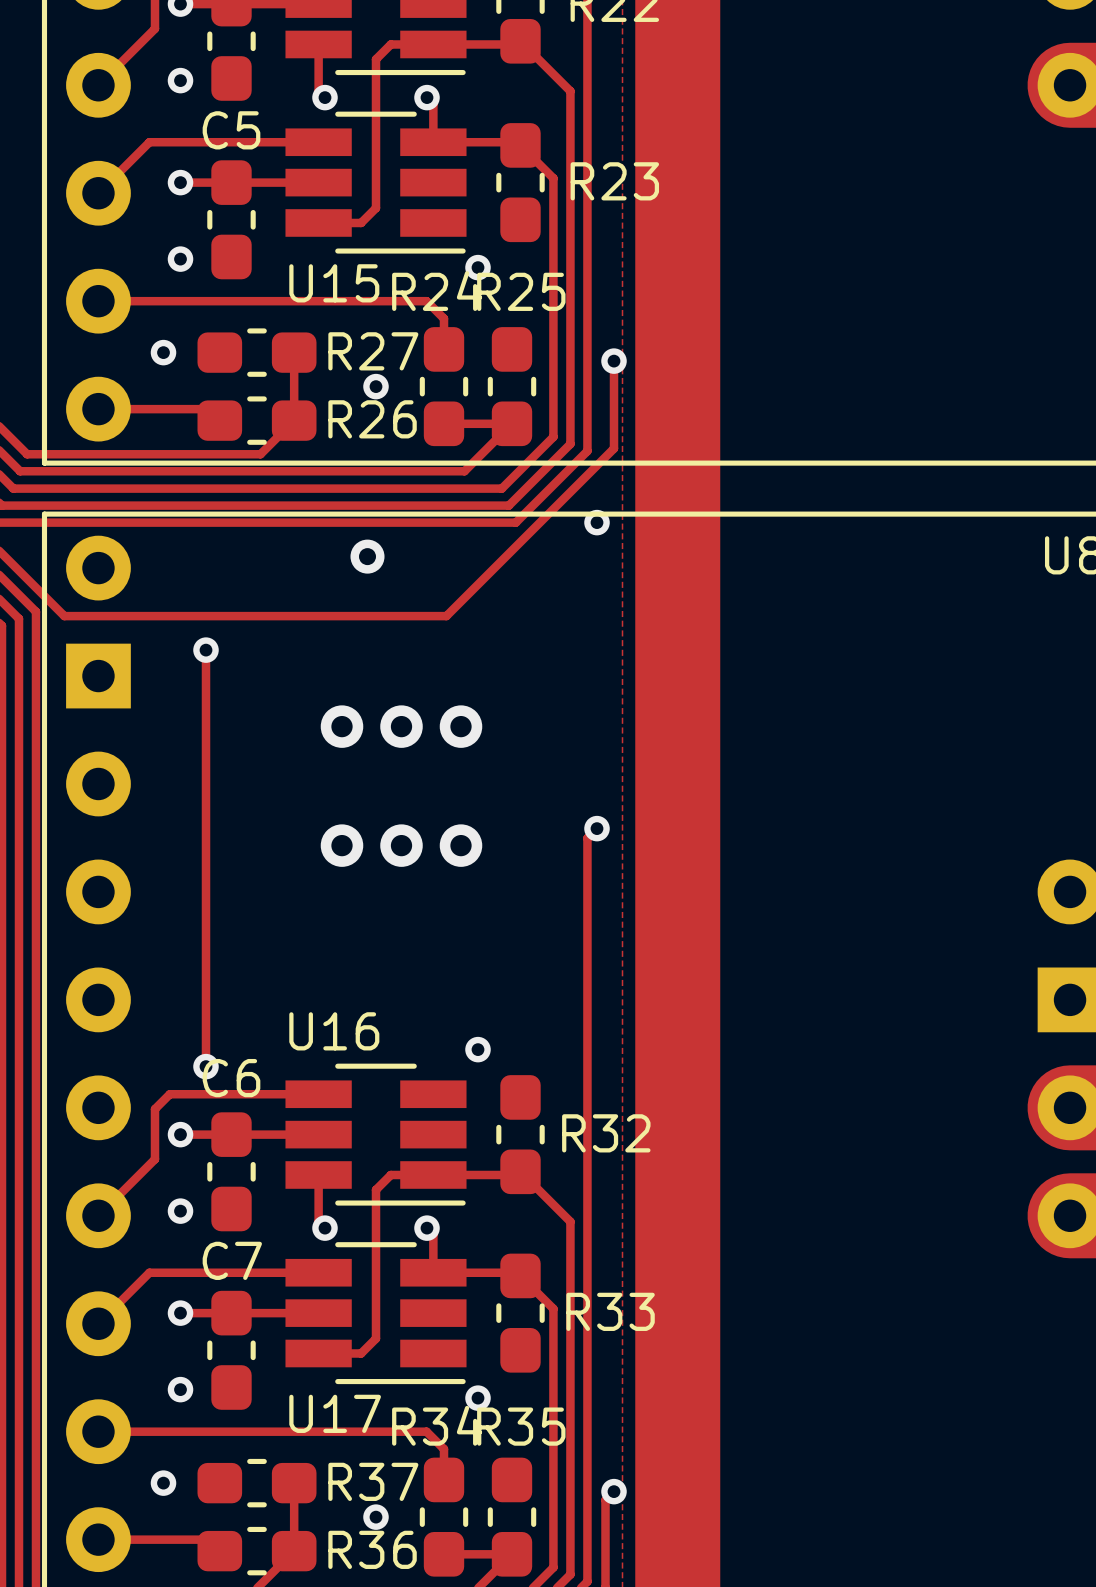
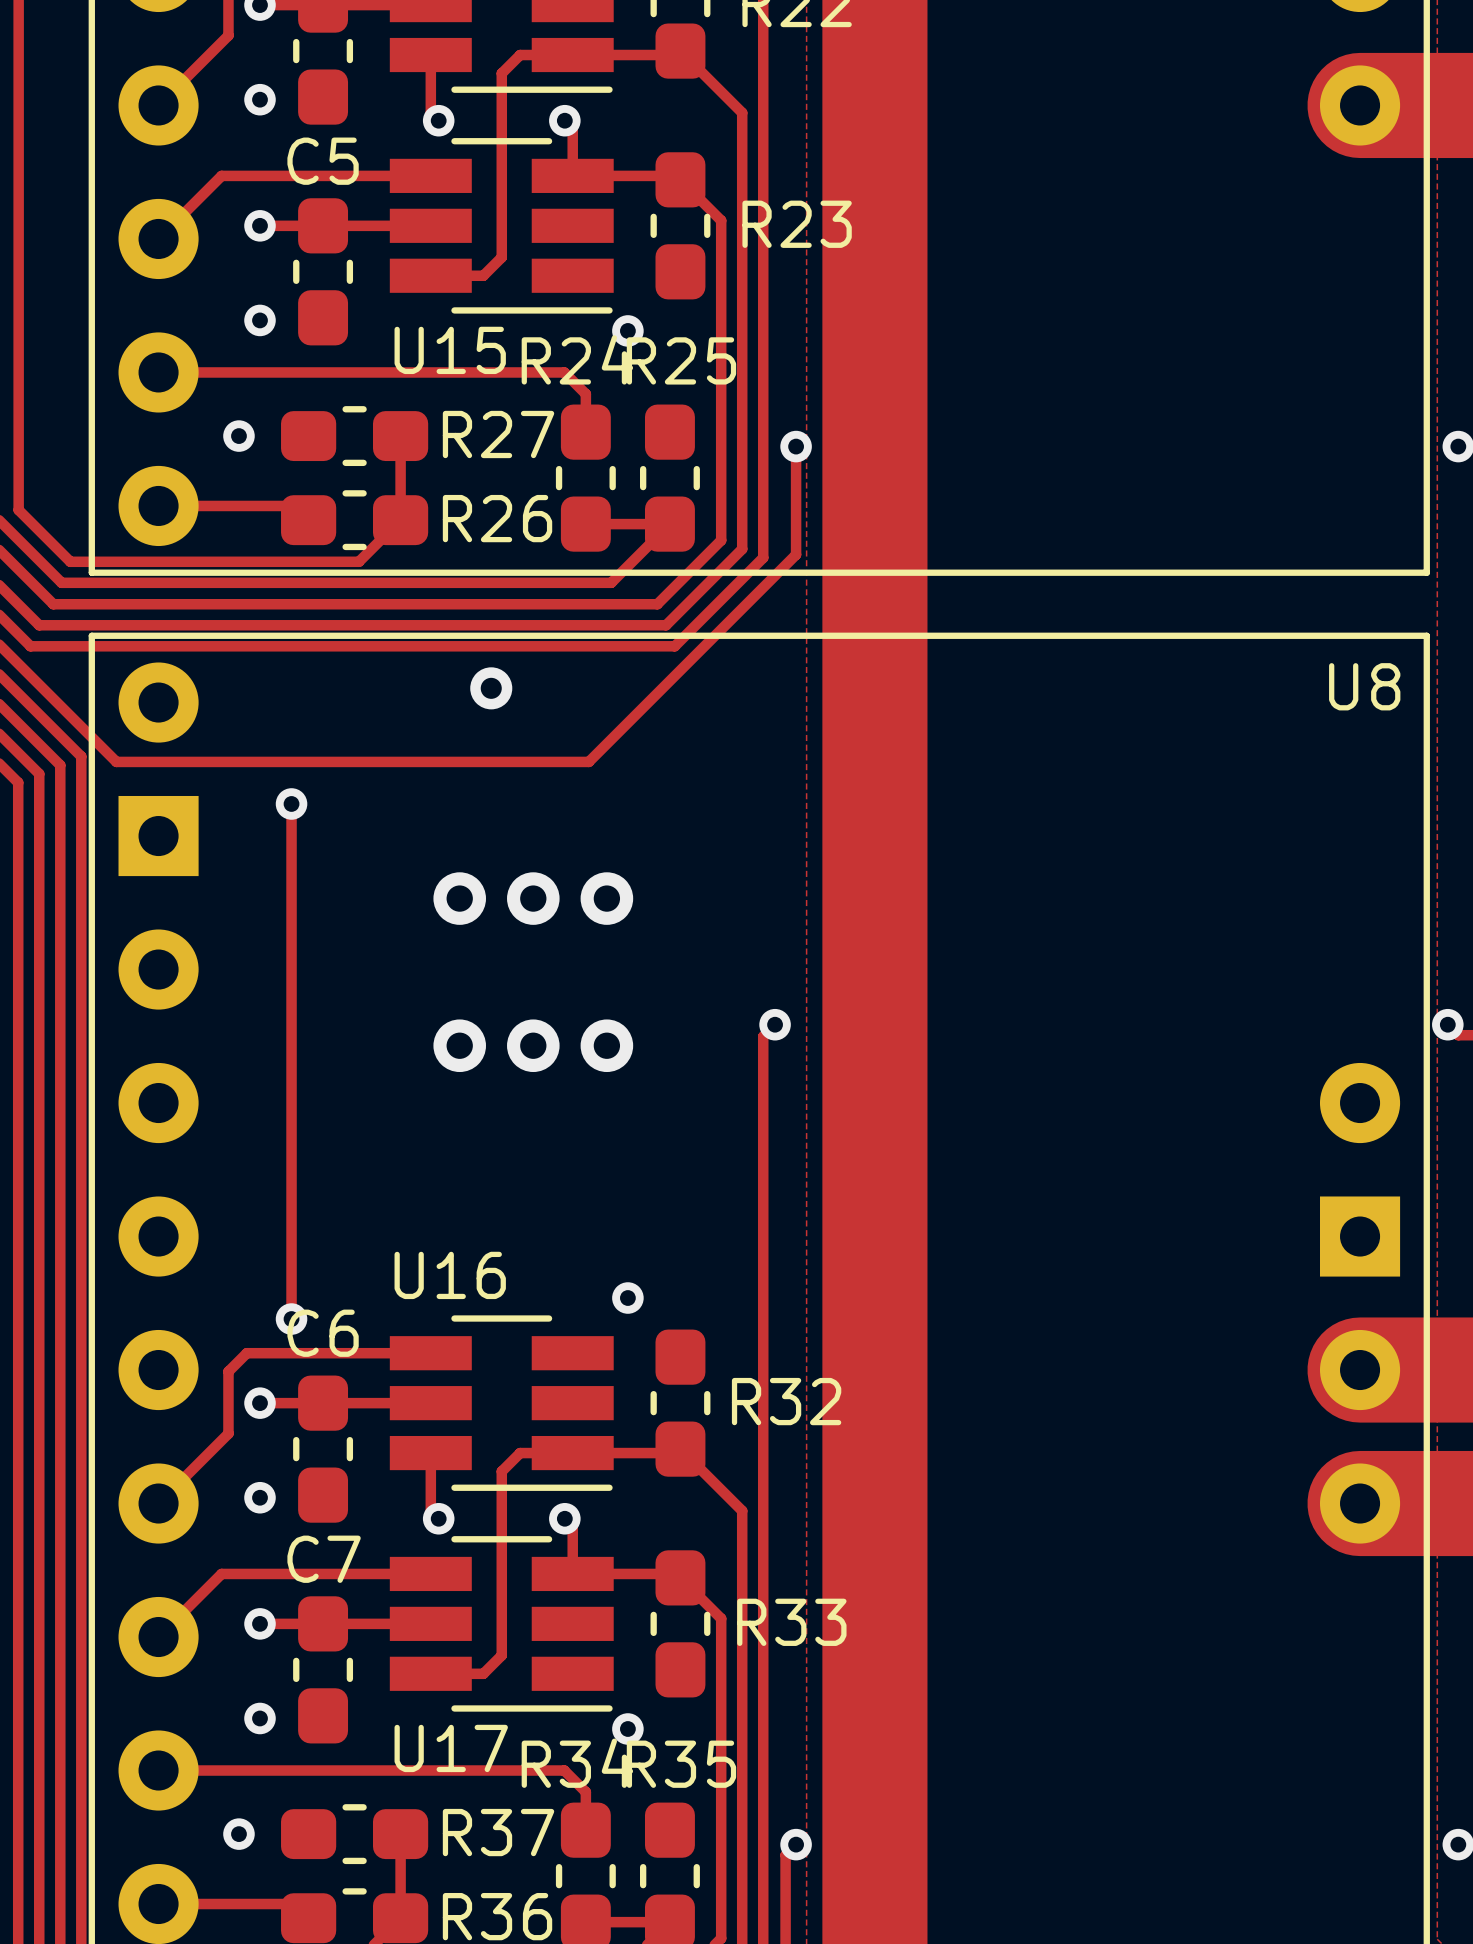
via: (376, 386) -> none
via: (597, 522) -> none
via: (376, 1517) -> none

